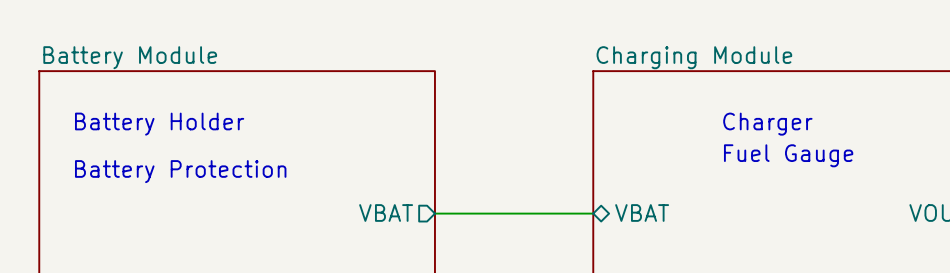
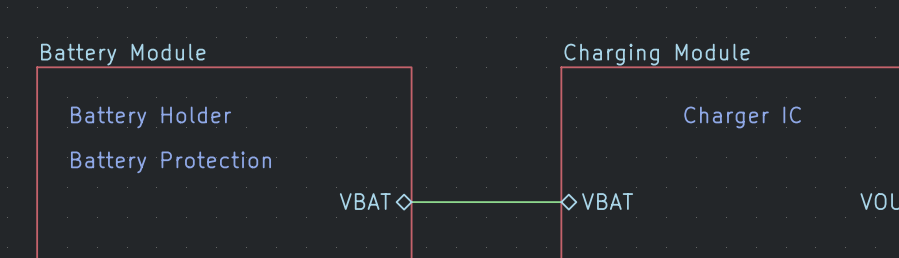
text: Charger (767, 124) -> Charger IC (742, 117)
text: Fuel Gauge (788, 155) -> none
sheet pin shape: output (386, 213) -> bidirectional (365, 201)

